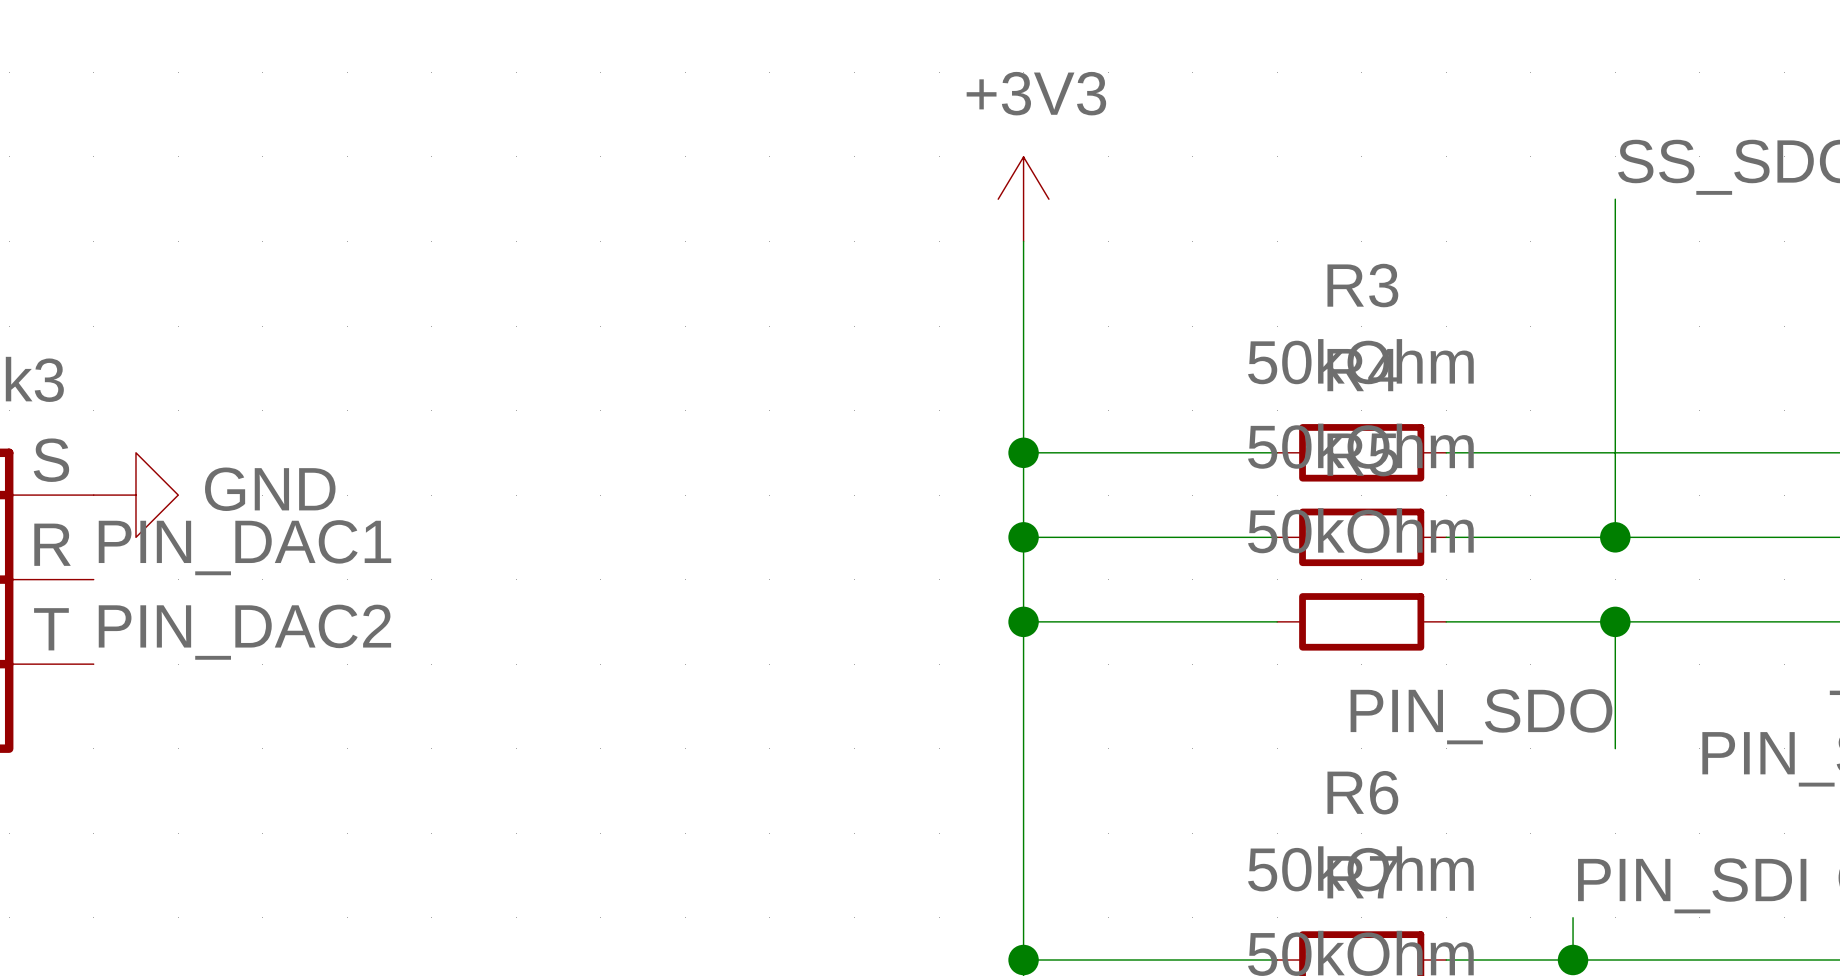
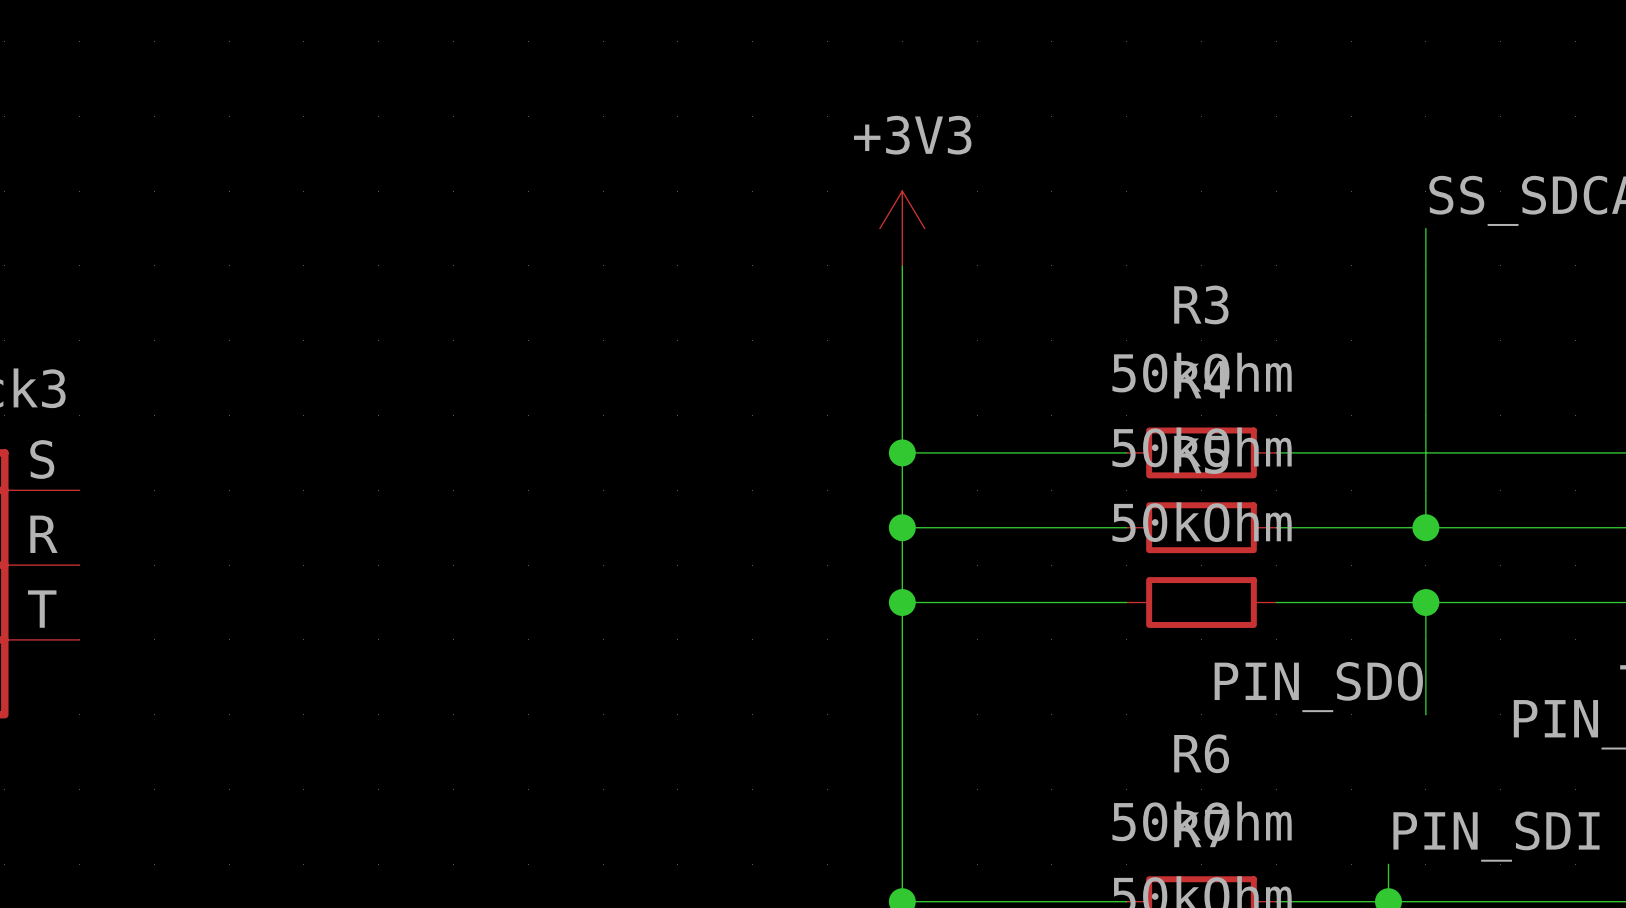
power symbol: GND (135, 495) -> none
label: PIN_DAC1 (244, 547) -> none
label: PIN_DAC2 (244, 632) -> none

